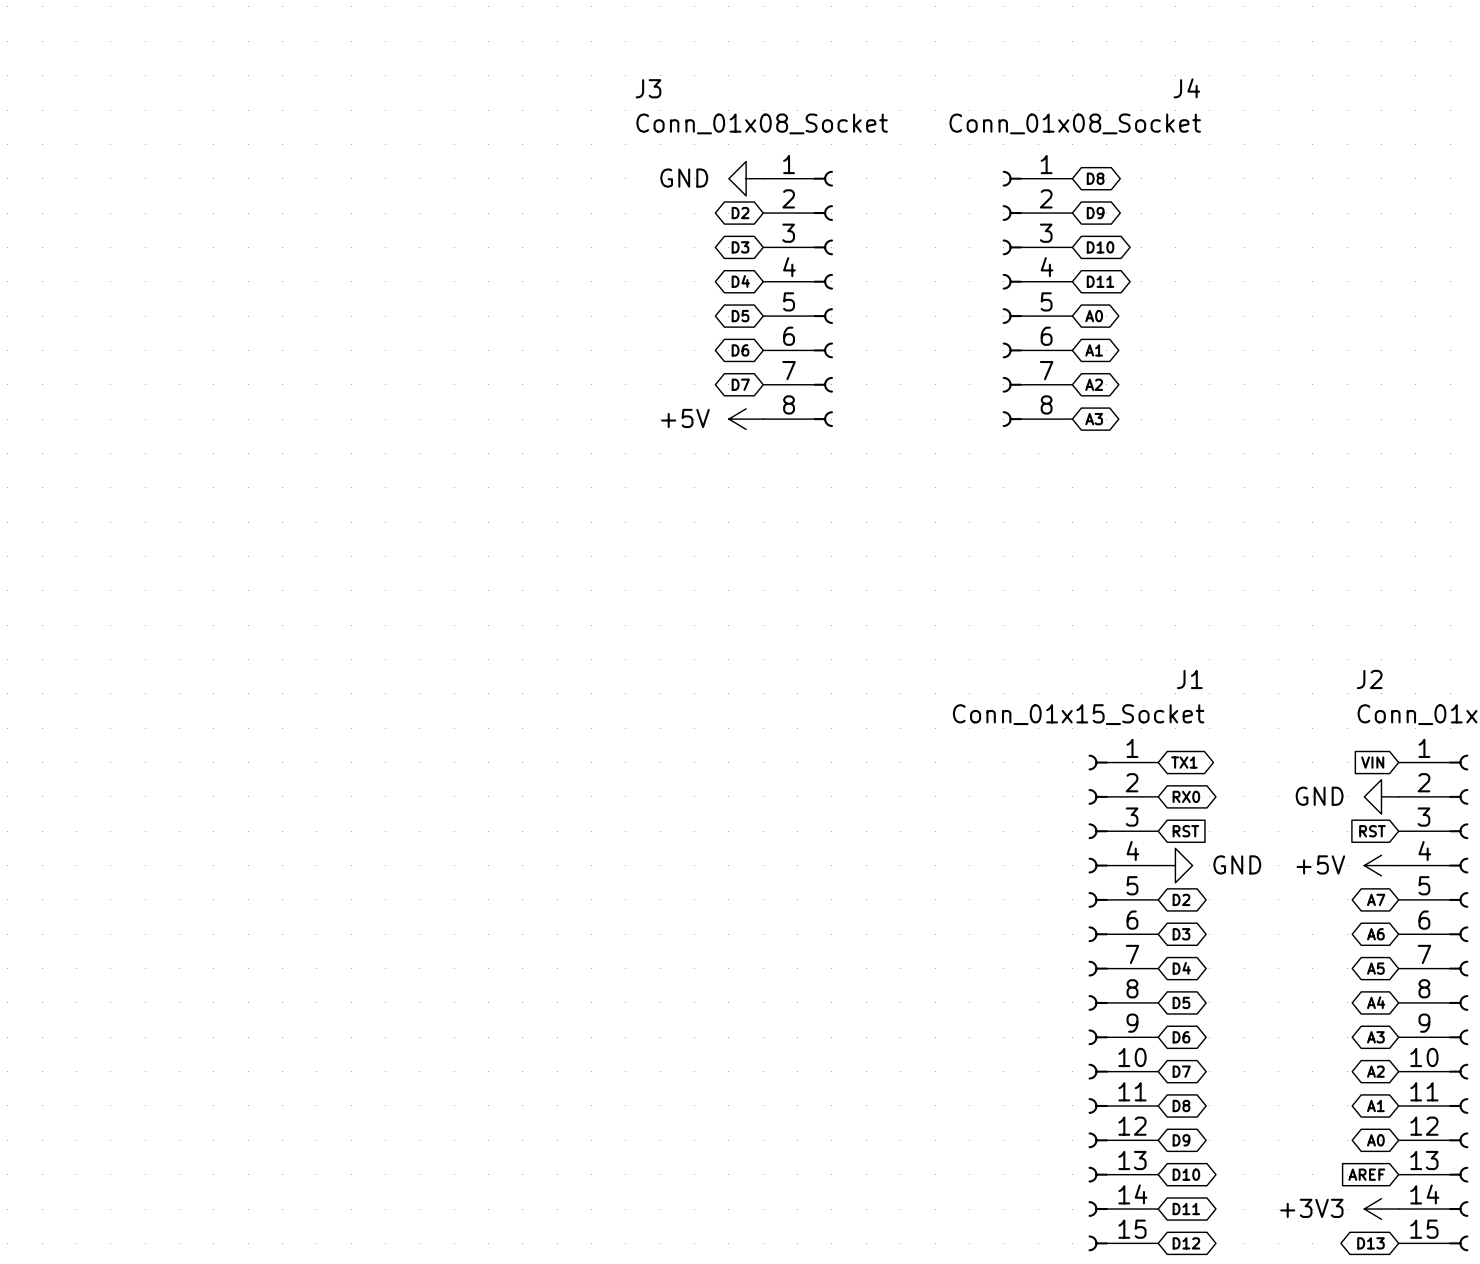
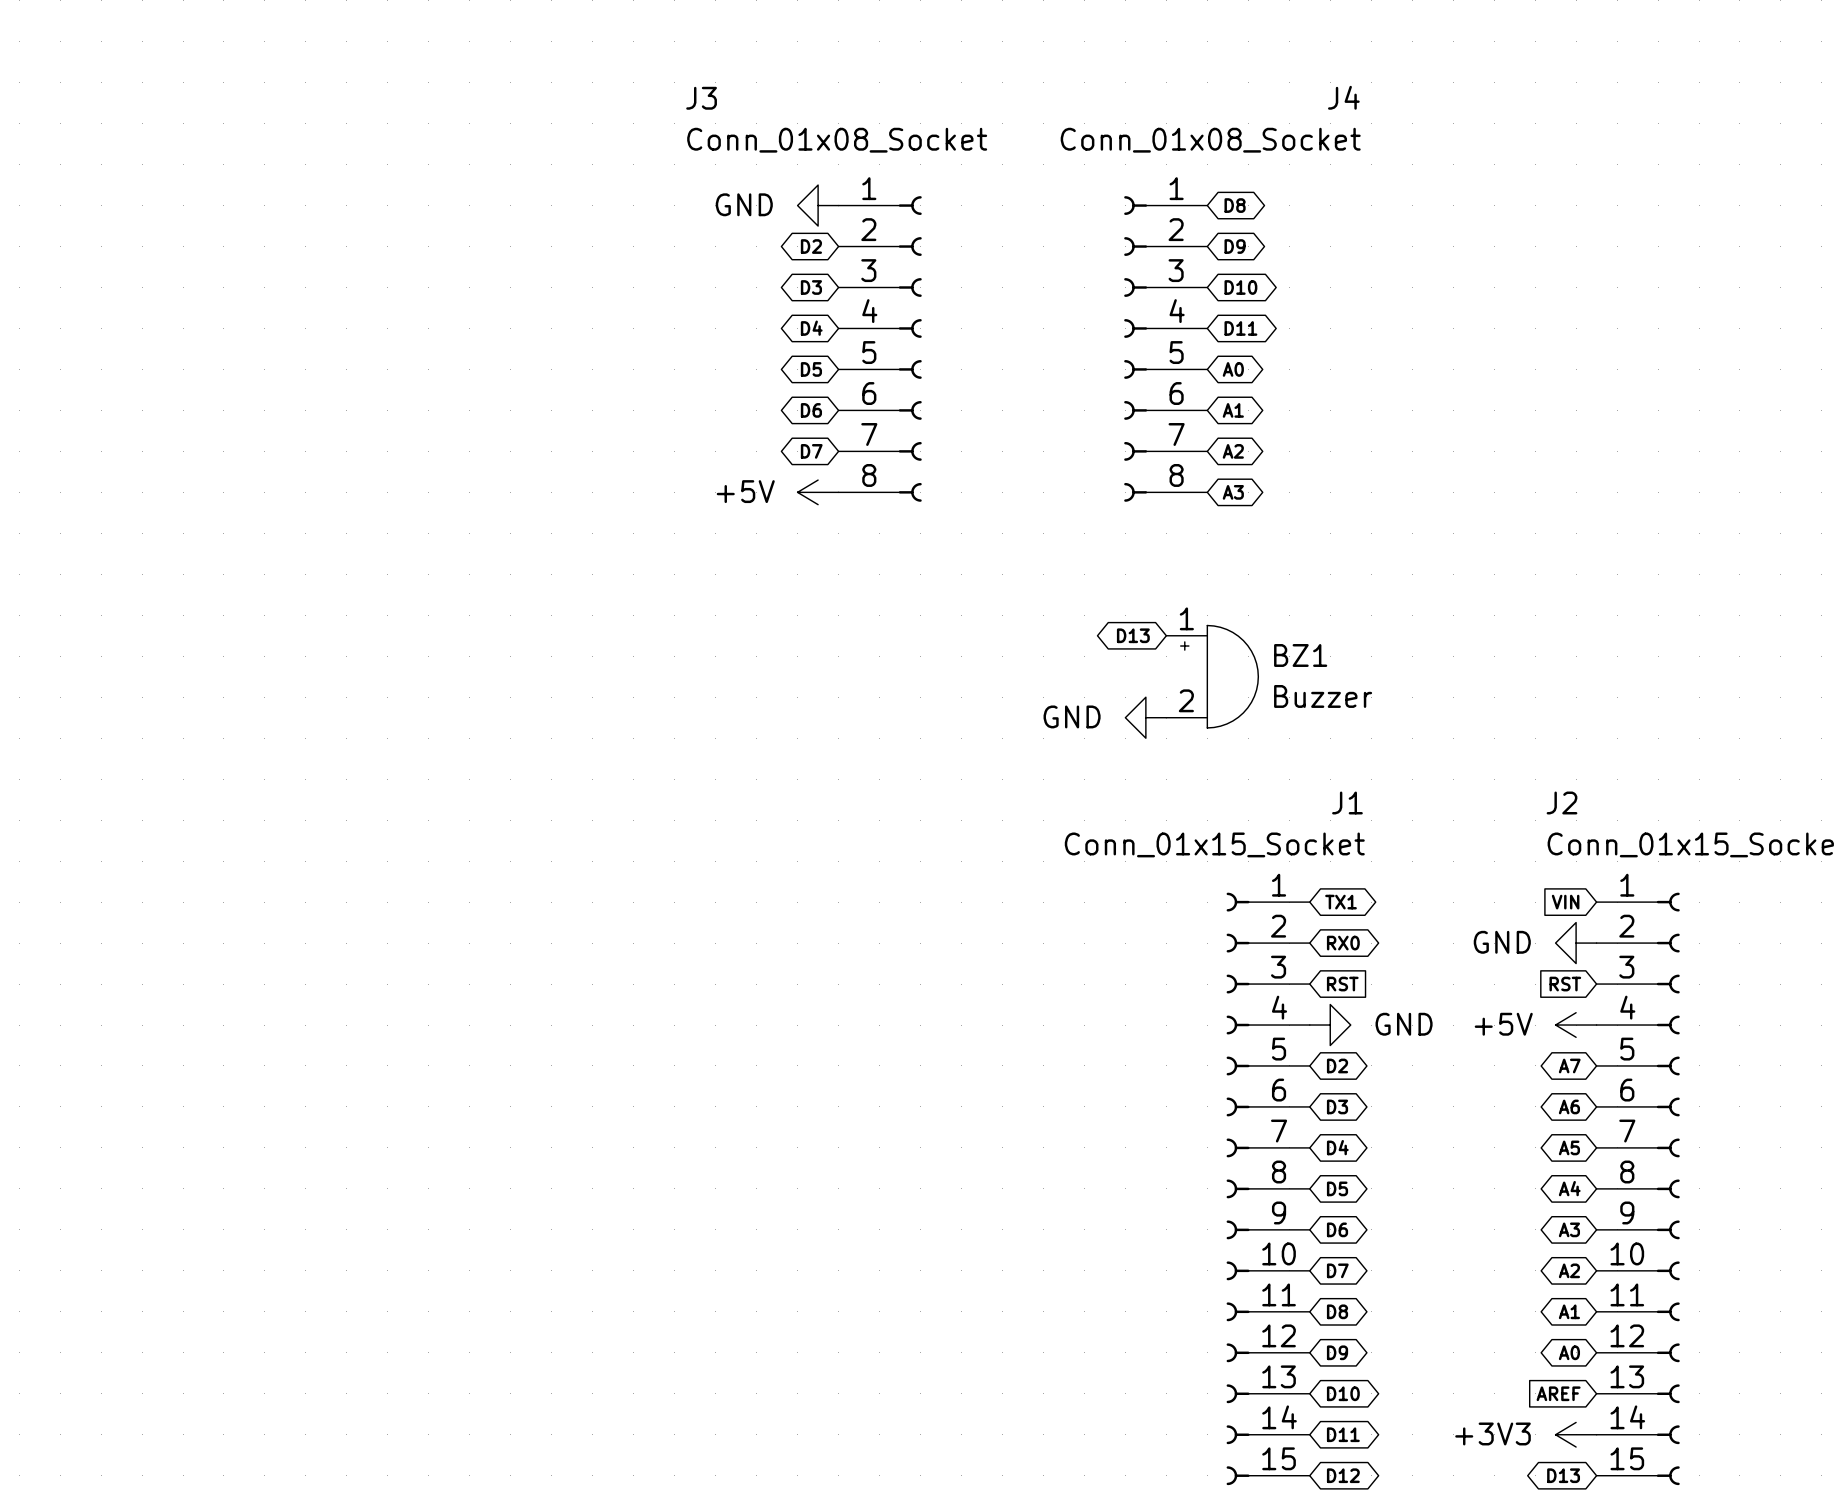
global label: none -> D13 (1133, 635)
BZ1: none -> Buzzer (1212, 676)
power symbol: none -> GND (1145, 717)

